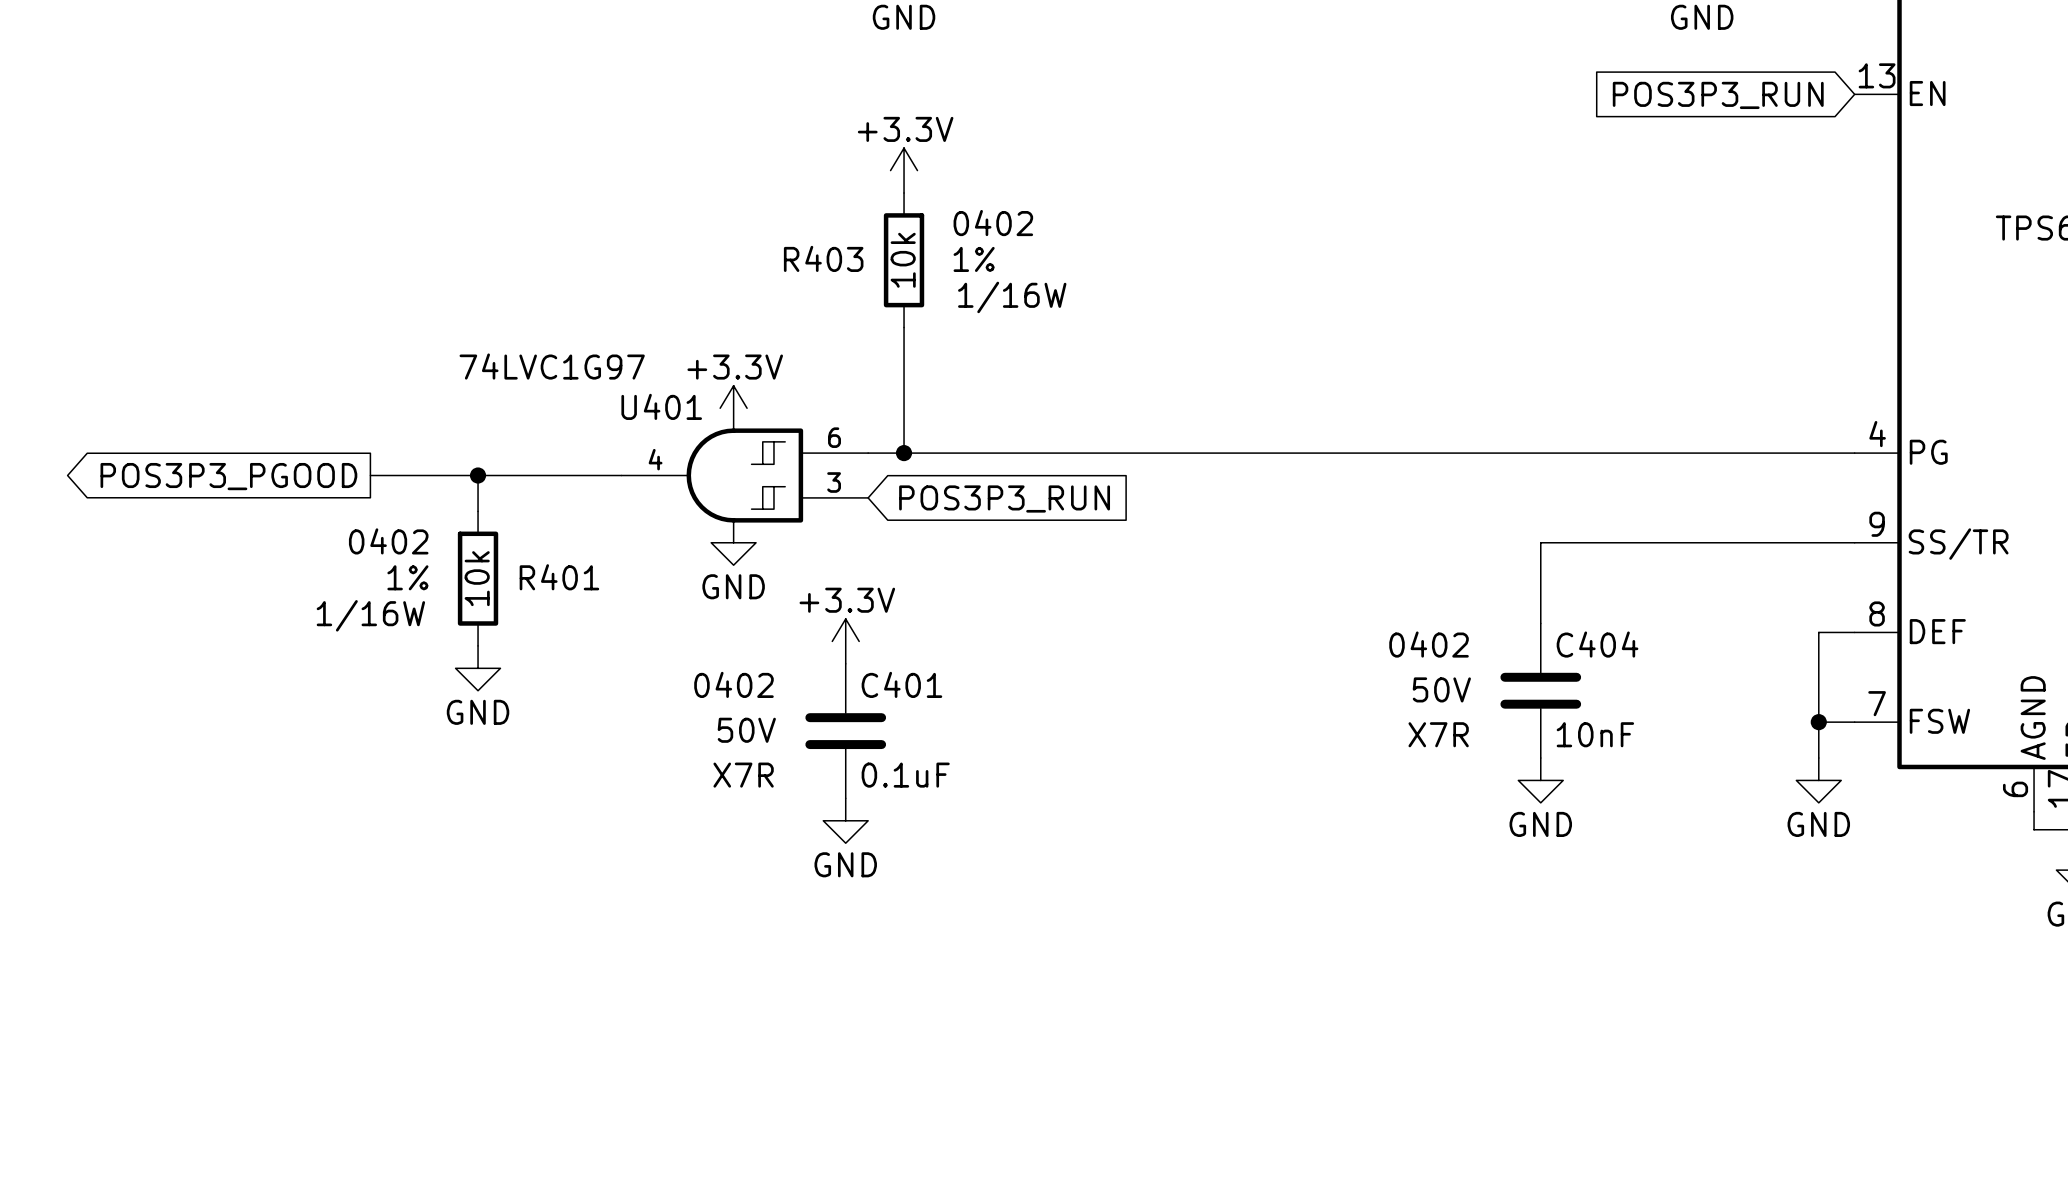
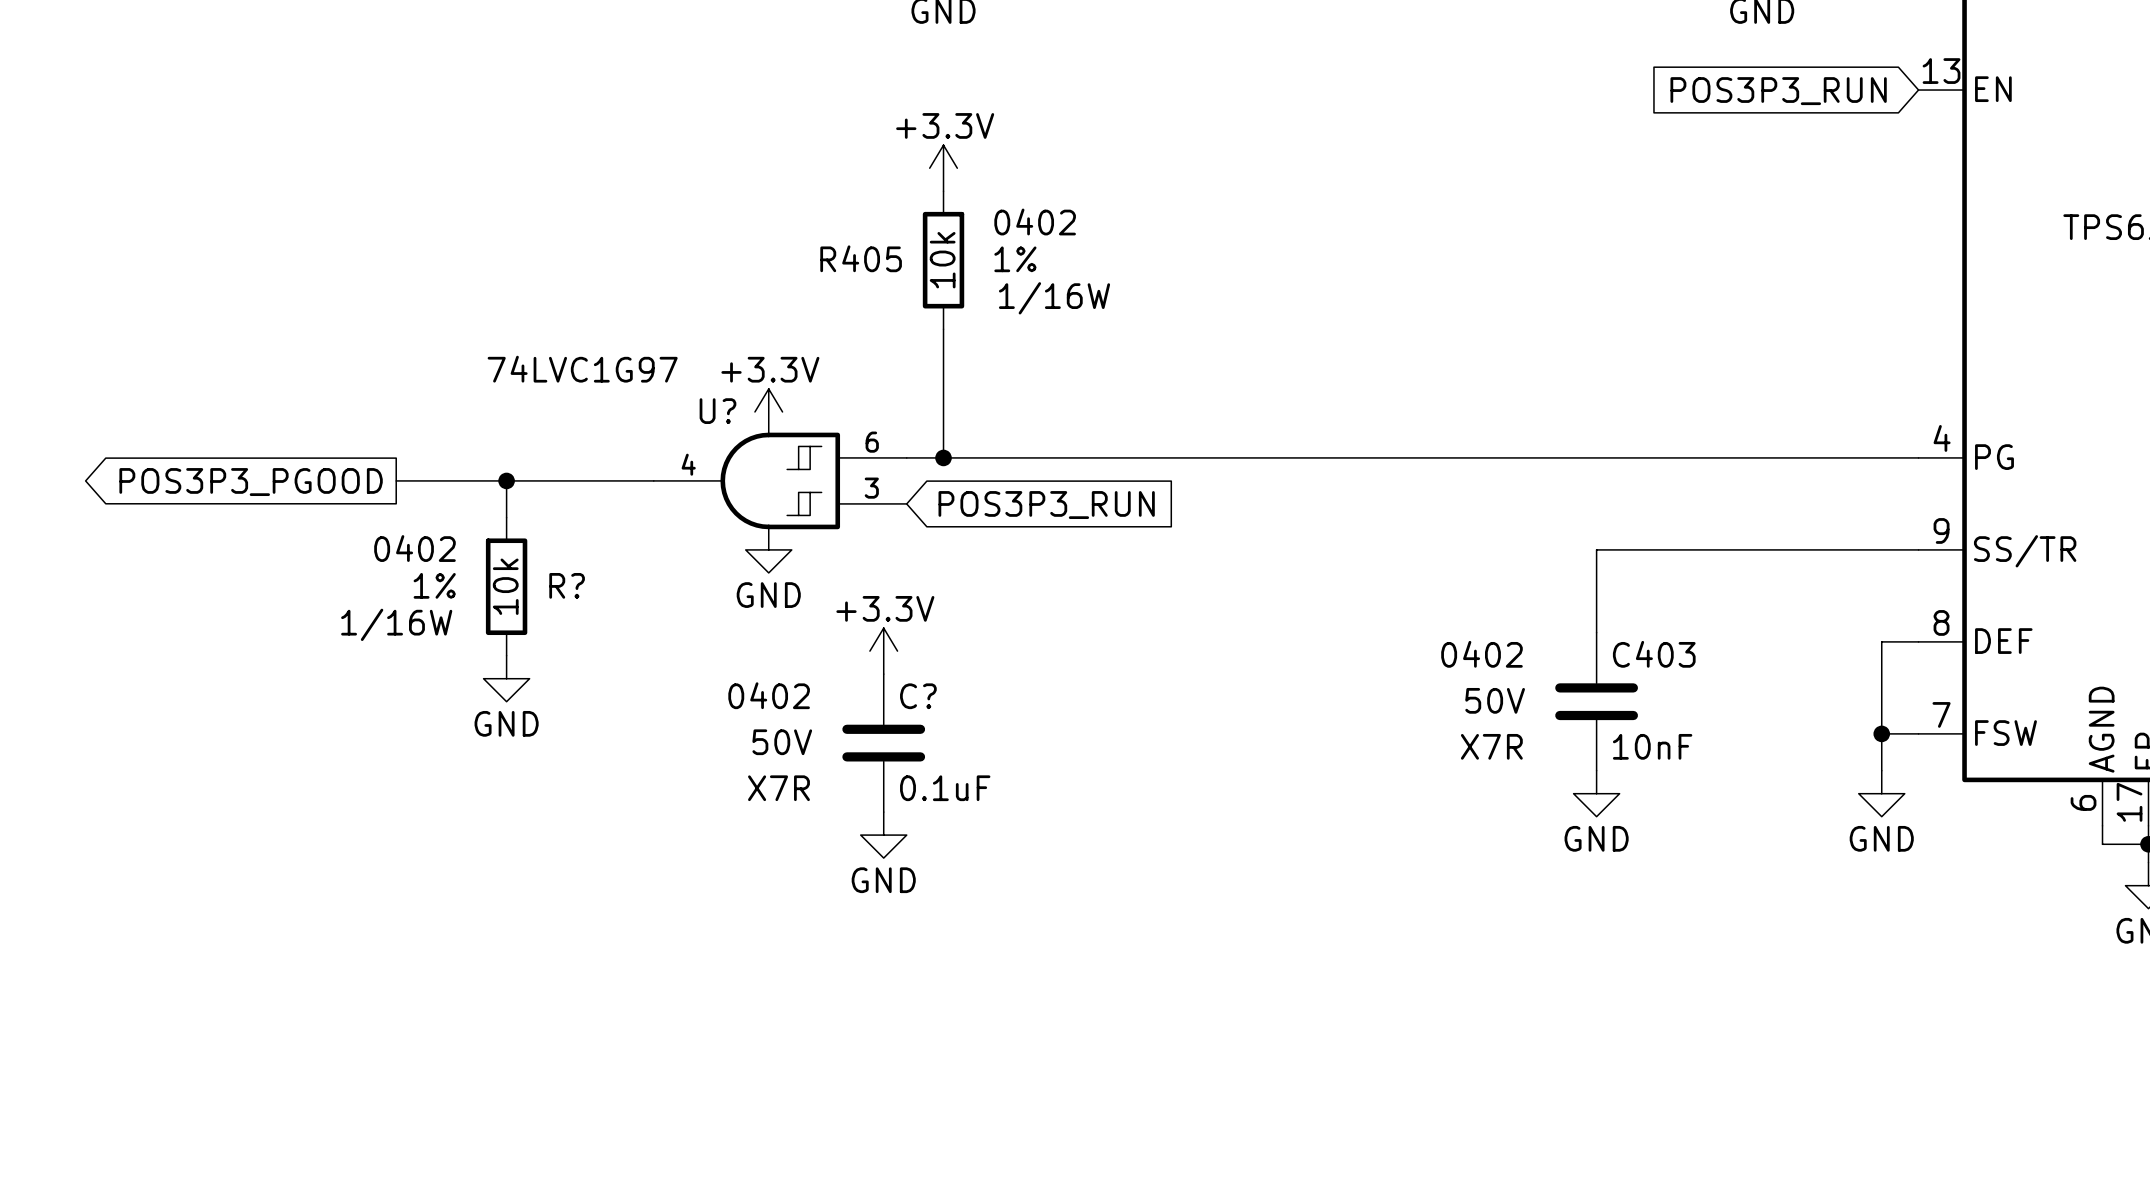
R403 name: R403 (823, 258) -> R405 (861, 258)
U401 name: U401 (661, 406) -> U? (717, 411)
R401 name: R401 (559, 577) -> R? (567, 585)
C404 name: C404 (1597, 644) -> C403 (1654, 654)
C401 name: C401 (901, 684) -> C? (918, 696)

